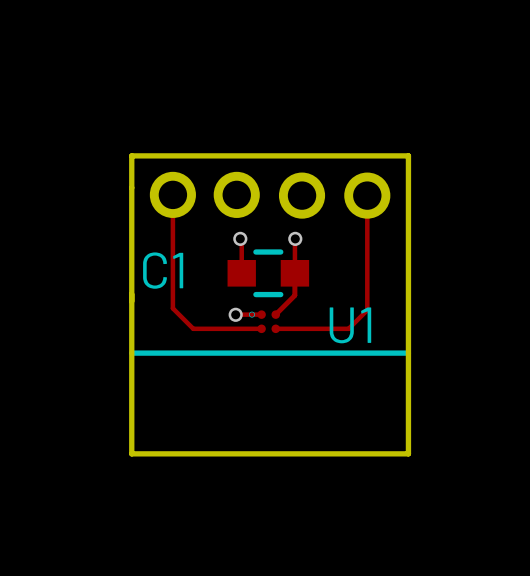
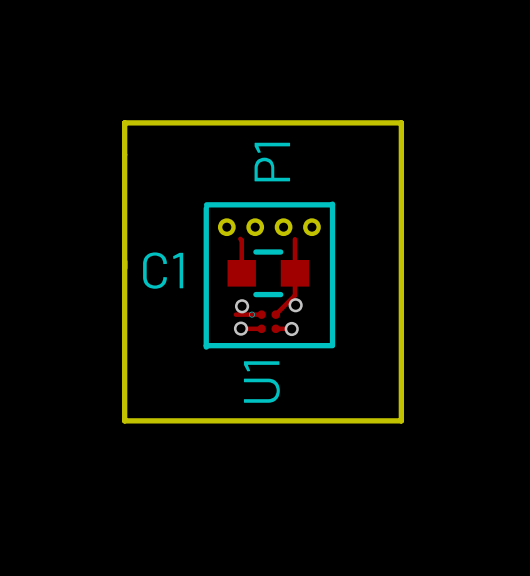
board edge: (131, 155) (131, 453) (408, 453) (408, 155) (131, 155) -> (124, 122) (124, 420) (401, 420) (401, 122) (124, 122)
track: (172, 194) (172, 308) (193, 328) (241, 328) -> none
part: (270, 195) -> none
track: (367, 195) (367, 310) (348, 328) (291, 328) -> none
line: none -> (206, 204) (332, 204)
line: none -> (332, 204) (332, 344)
line: none -> (206, 208) (206, 347)
P1: none -> (269, 227)
via: (240, 238) -> none
via: (295, 238) -> none
via: none -> (295, 305)
via: none -> (242, 306)
via: (235, 314) -> none
U1 name rotation: 0° (350, 325) -> 90° counterclockwise (261, 382)
U1 name position: U1 (350, 325) -> U1 (261, 382)
via: none -> (241, 328)
via: none -> (291, 328)
line: none -> (206, 345) (332, 345)
line: (131, 353) (408, 353) -> none

